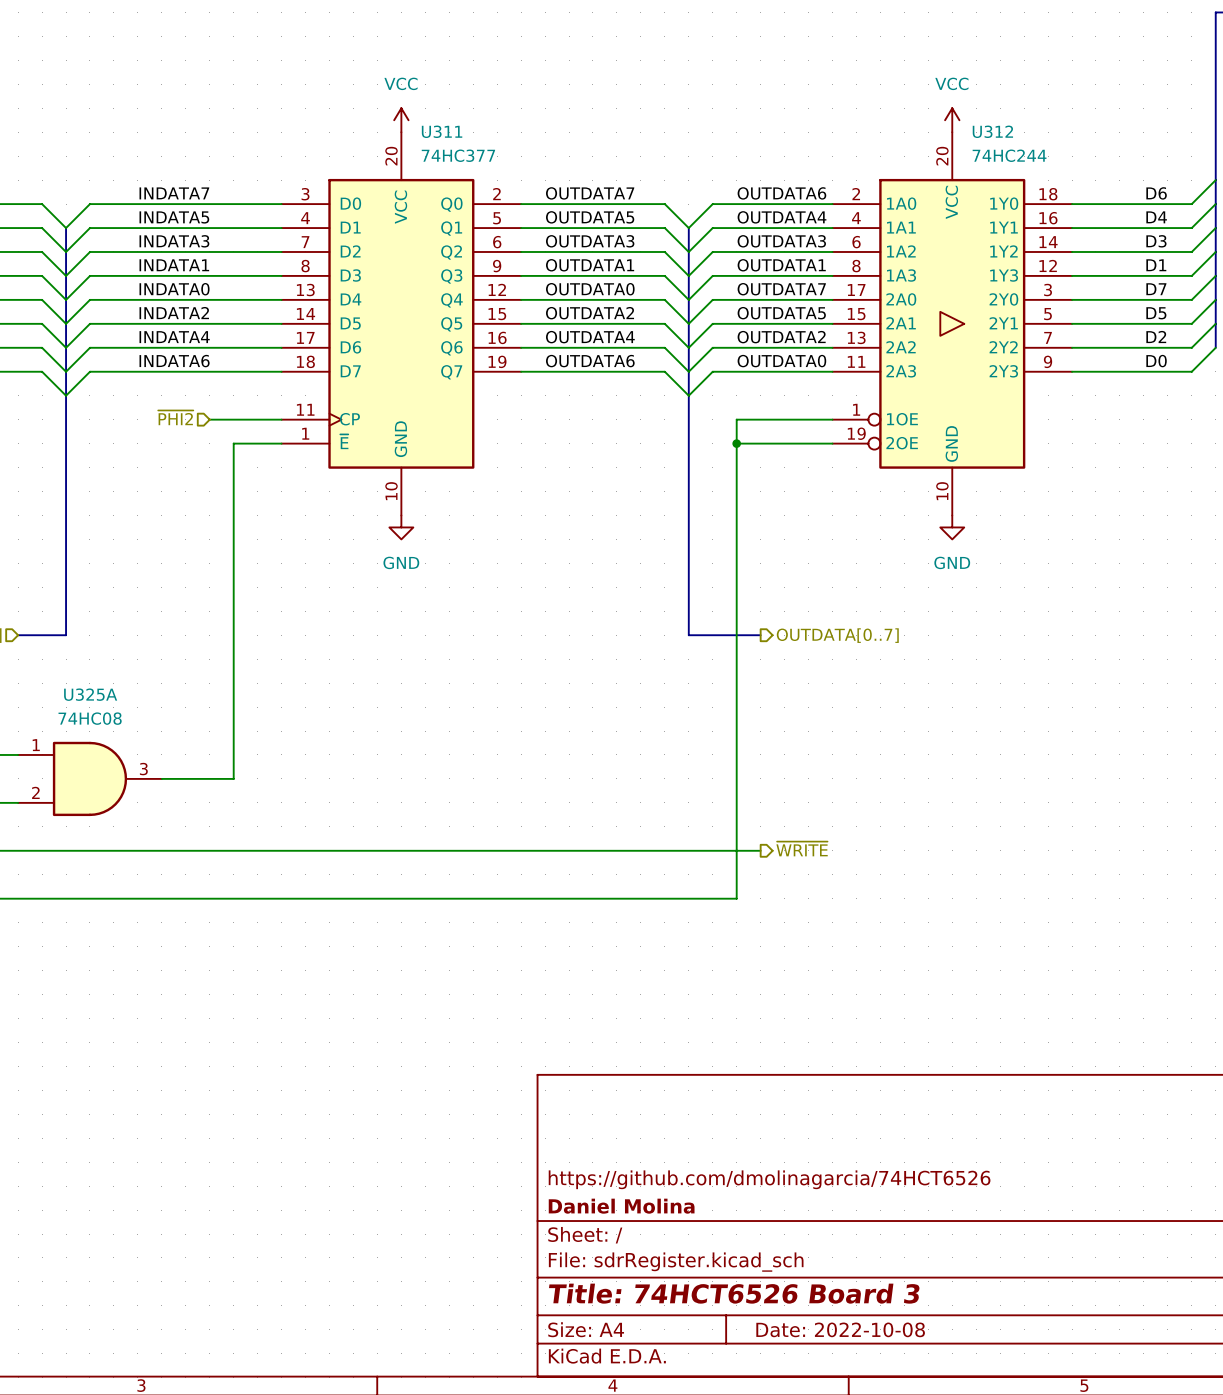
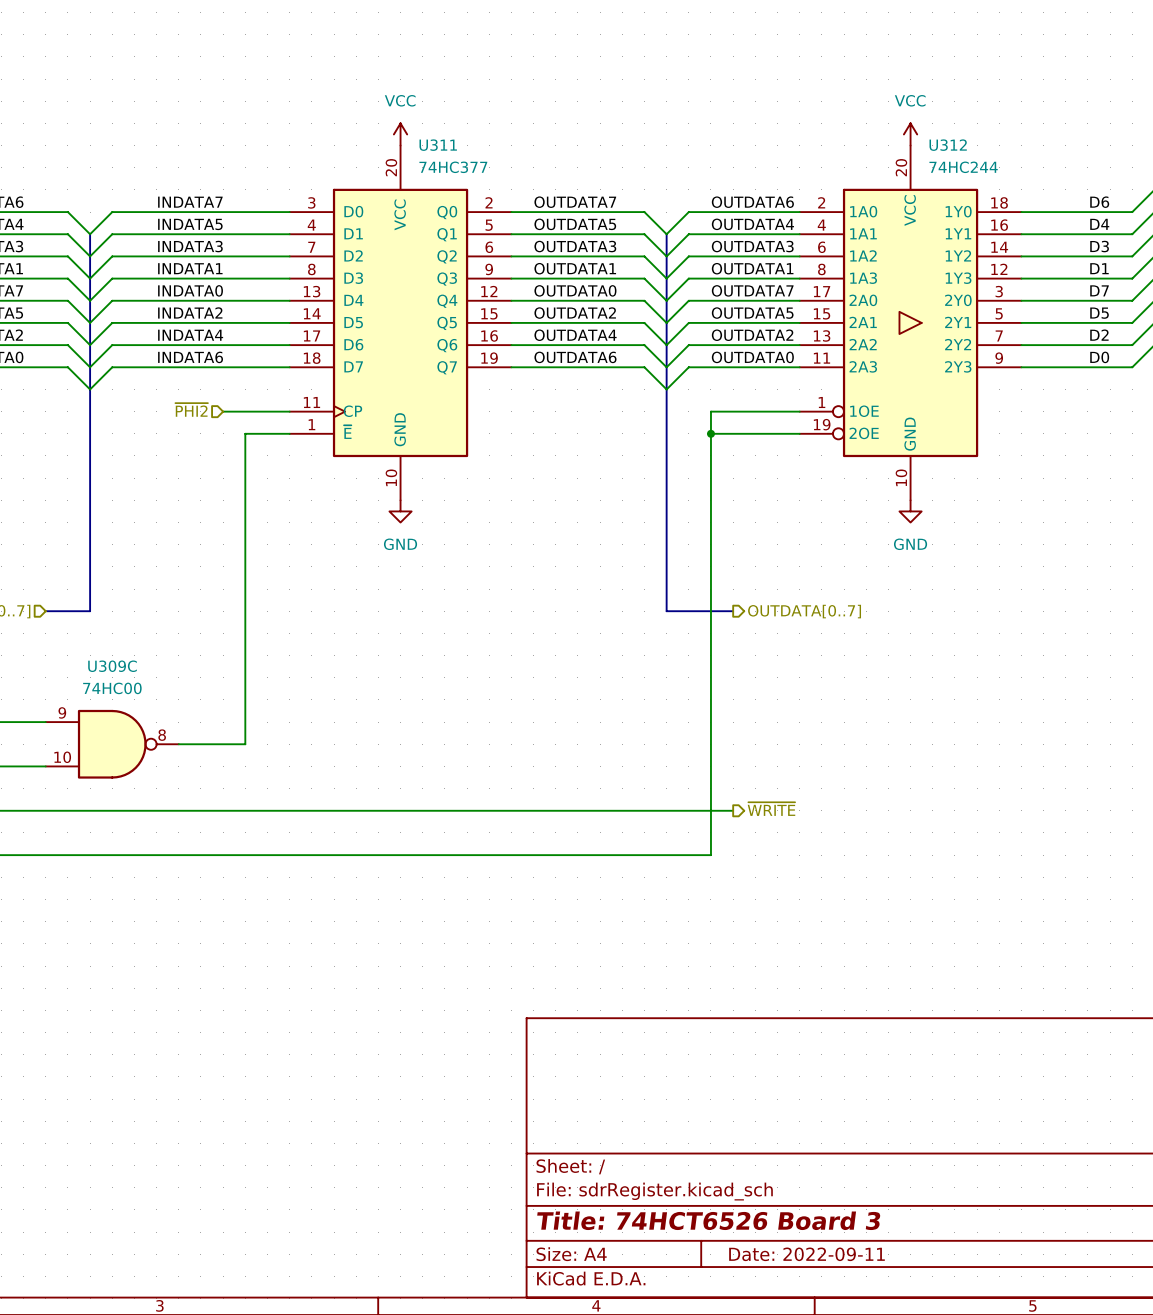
U325A: 74HC08 (89, 778) -> none
U309C: none -> 74HC00 (112, 744)
title block: https://github.com/dmolinagarcia/74HCT6526 (769, 1179) -> none
title block: Daniel Molina (621, 1206) -> none
title block: Date: 2022-10-08 (840, 1329) -> Date: 2022-09-11 (806, 1254)

